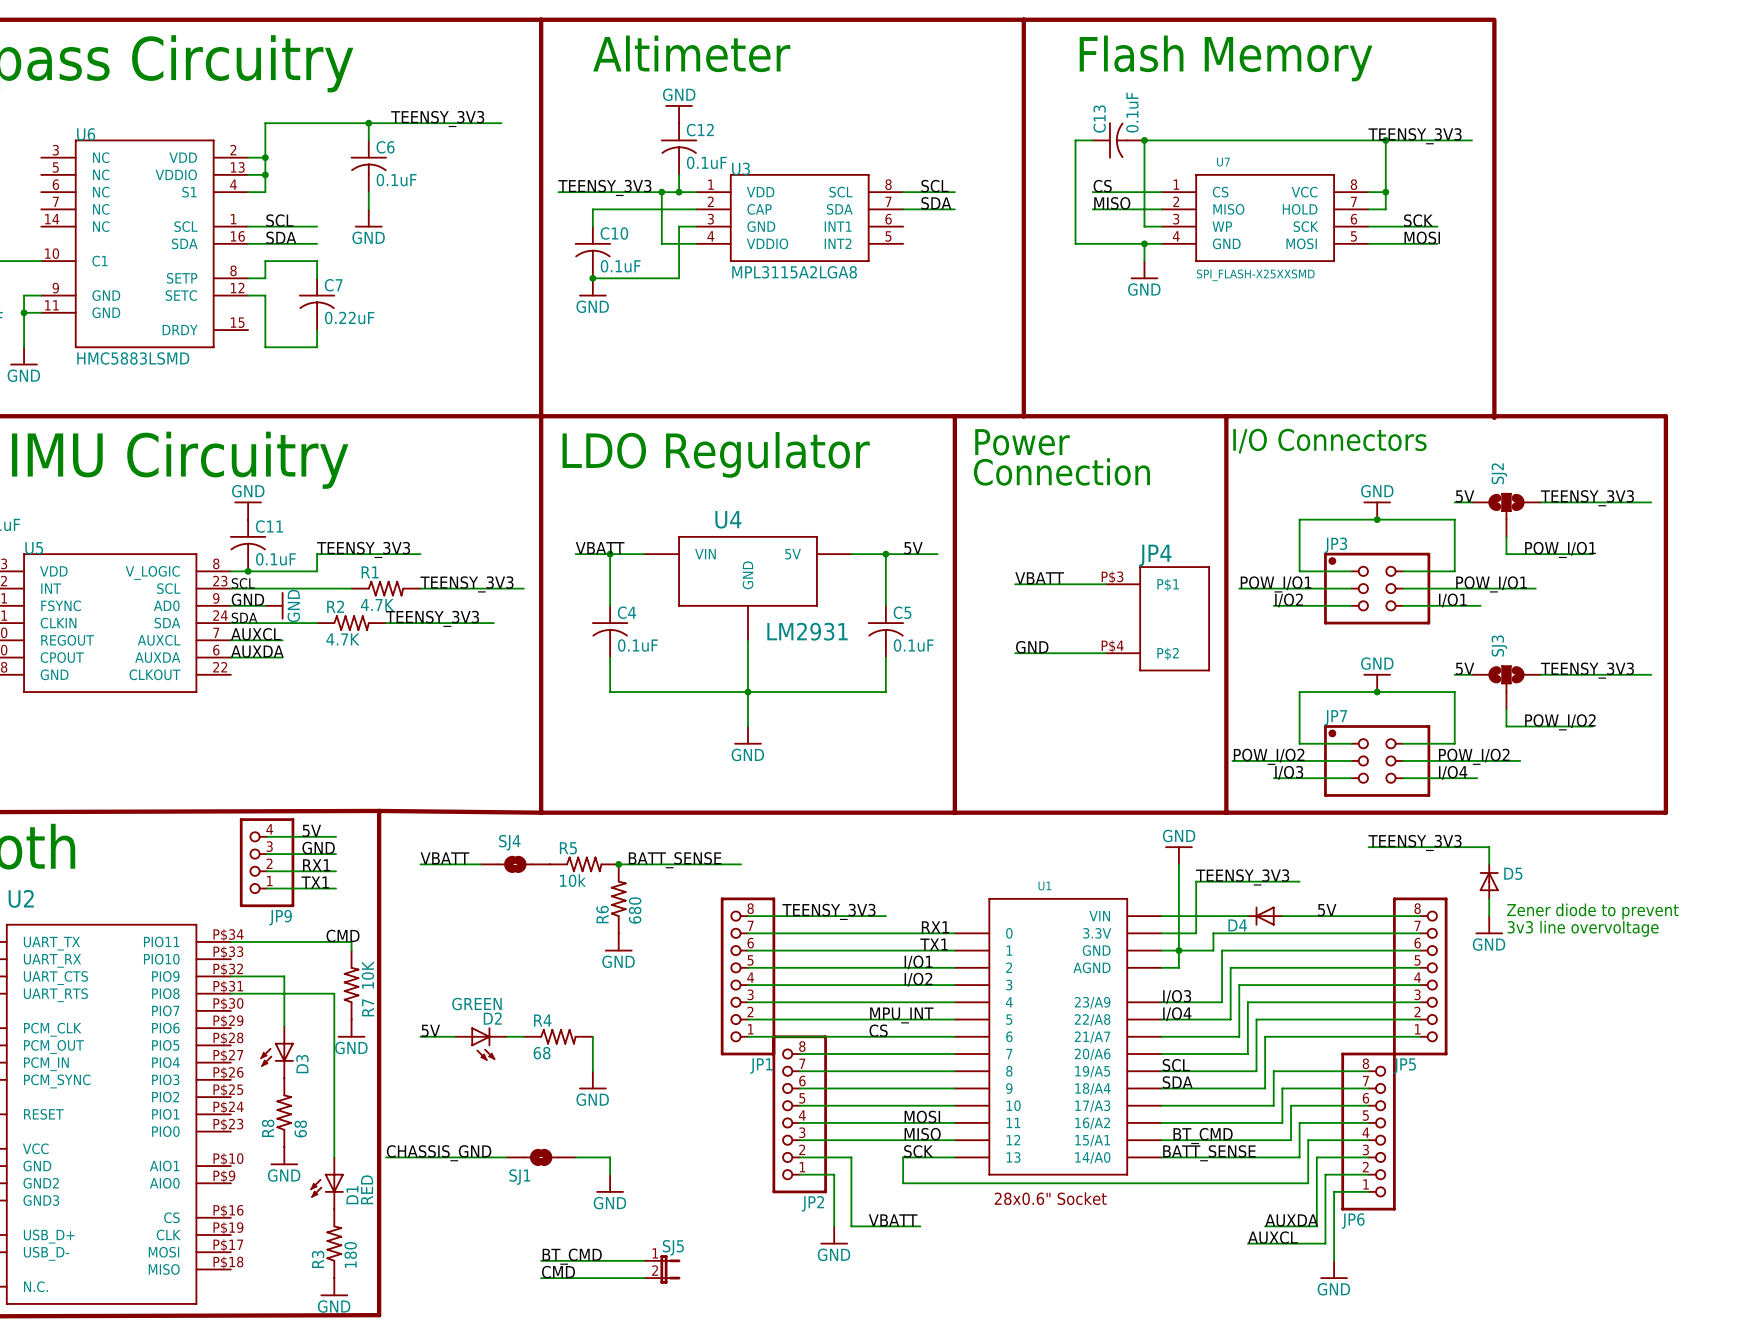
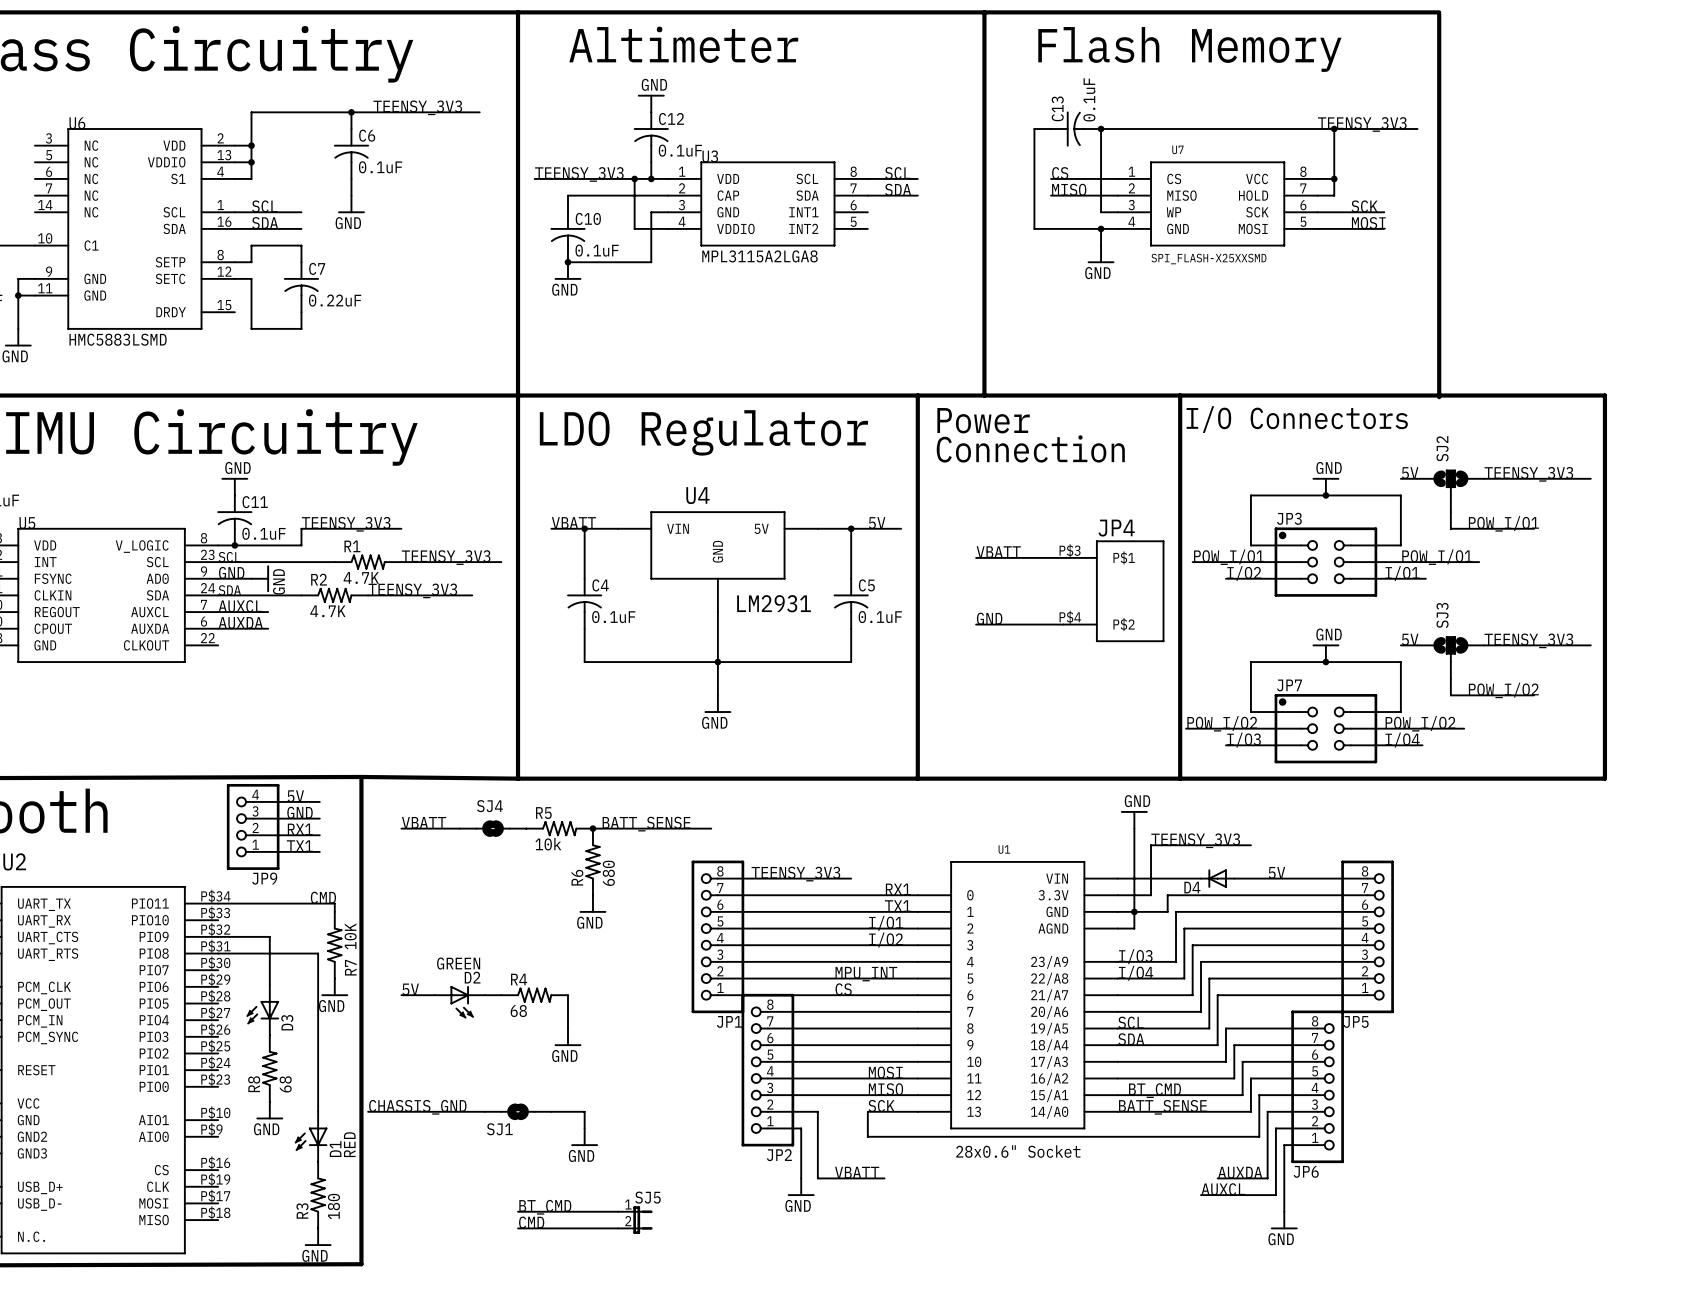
label: TEENSY_3V3 (1415, 842) -> none
wire: (1368, 847) (1489, 847) (1489, 864) -> none
D5: (1489, 881) -> none
wire: (1489, 898) (1489, 916) -> none
text: Zener diode to prevent (1592, 911) -> none
power symbol: GND (1489, 925) -> none
text: 3v3 line overvoltage (1583, 928) -> none

